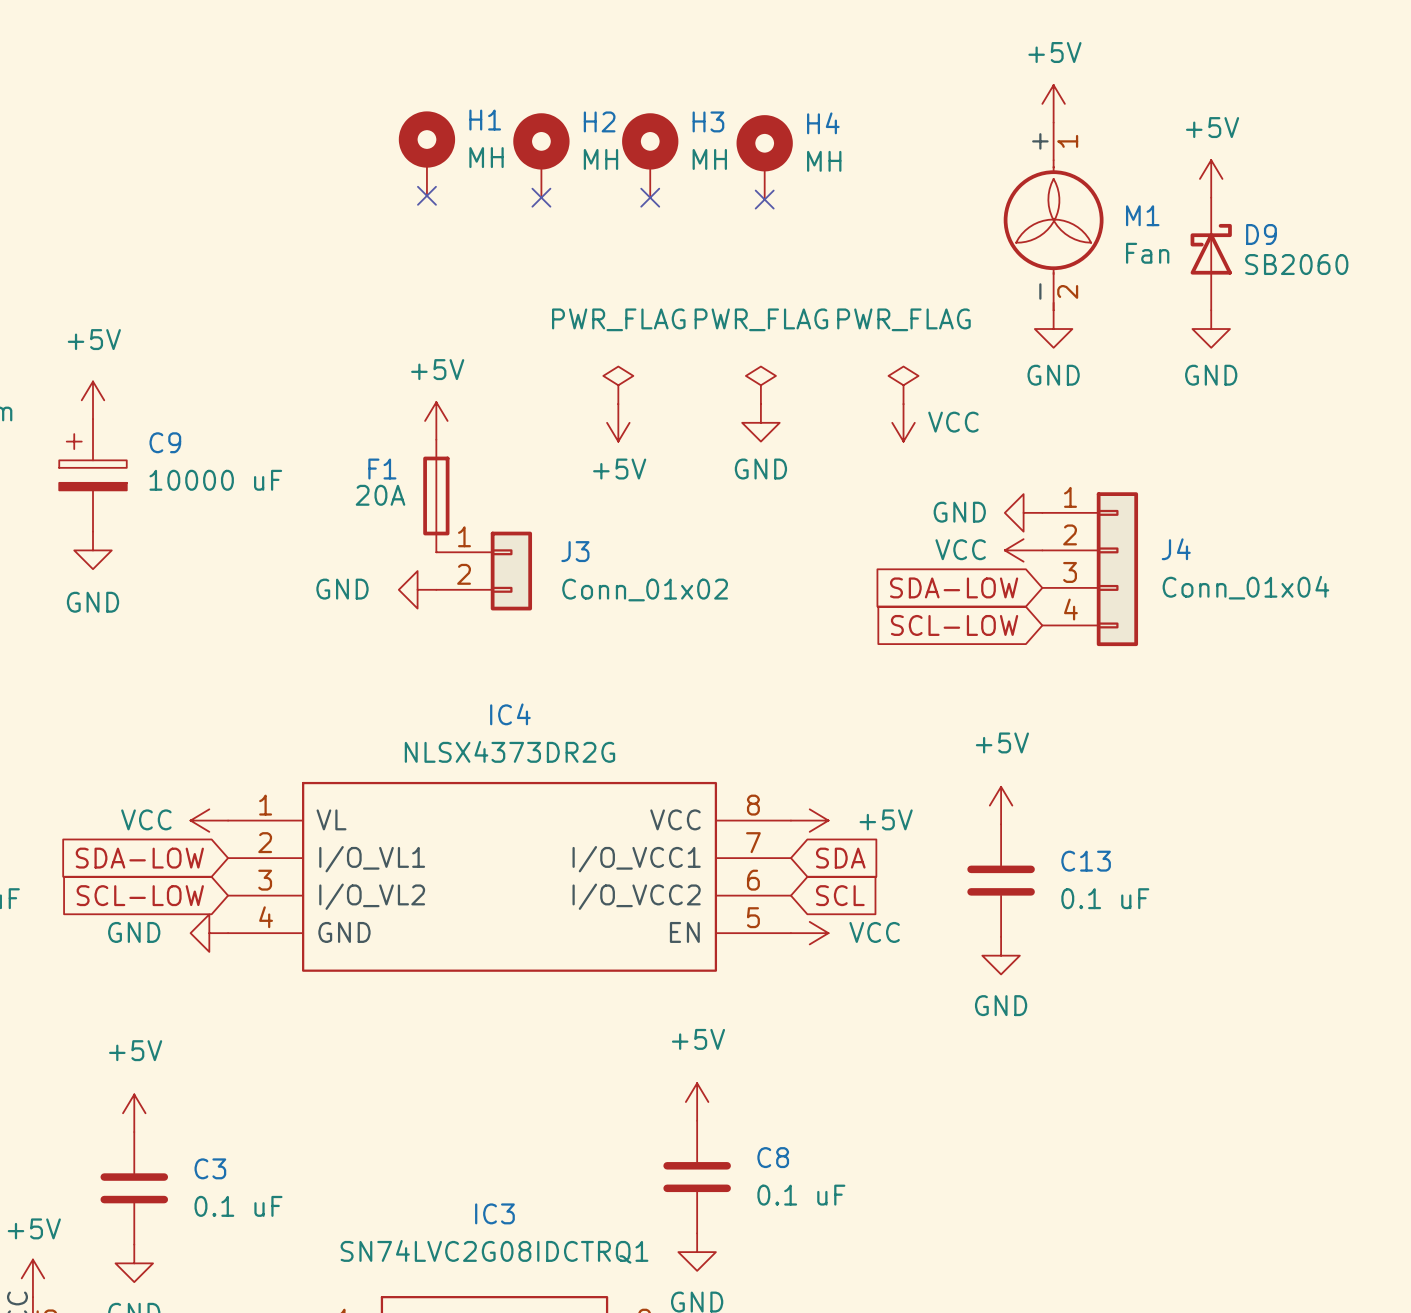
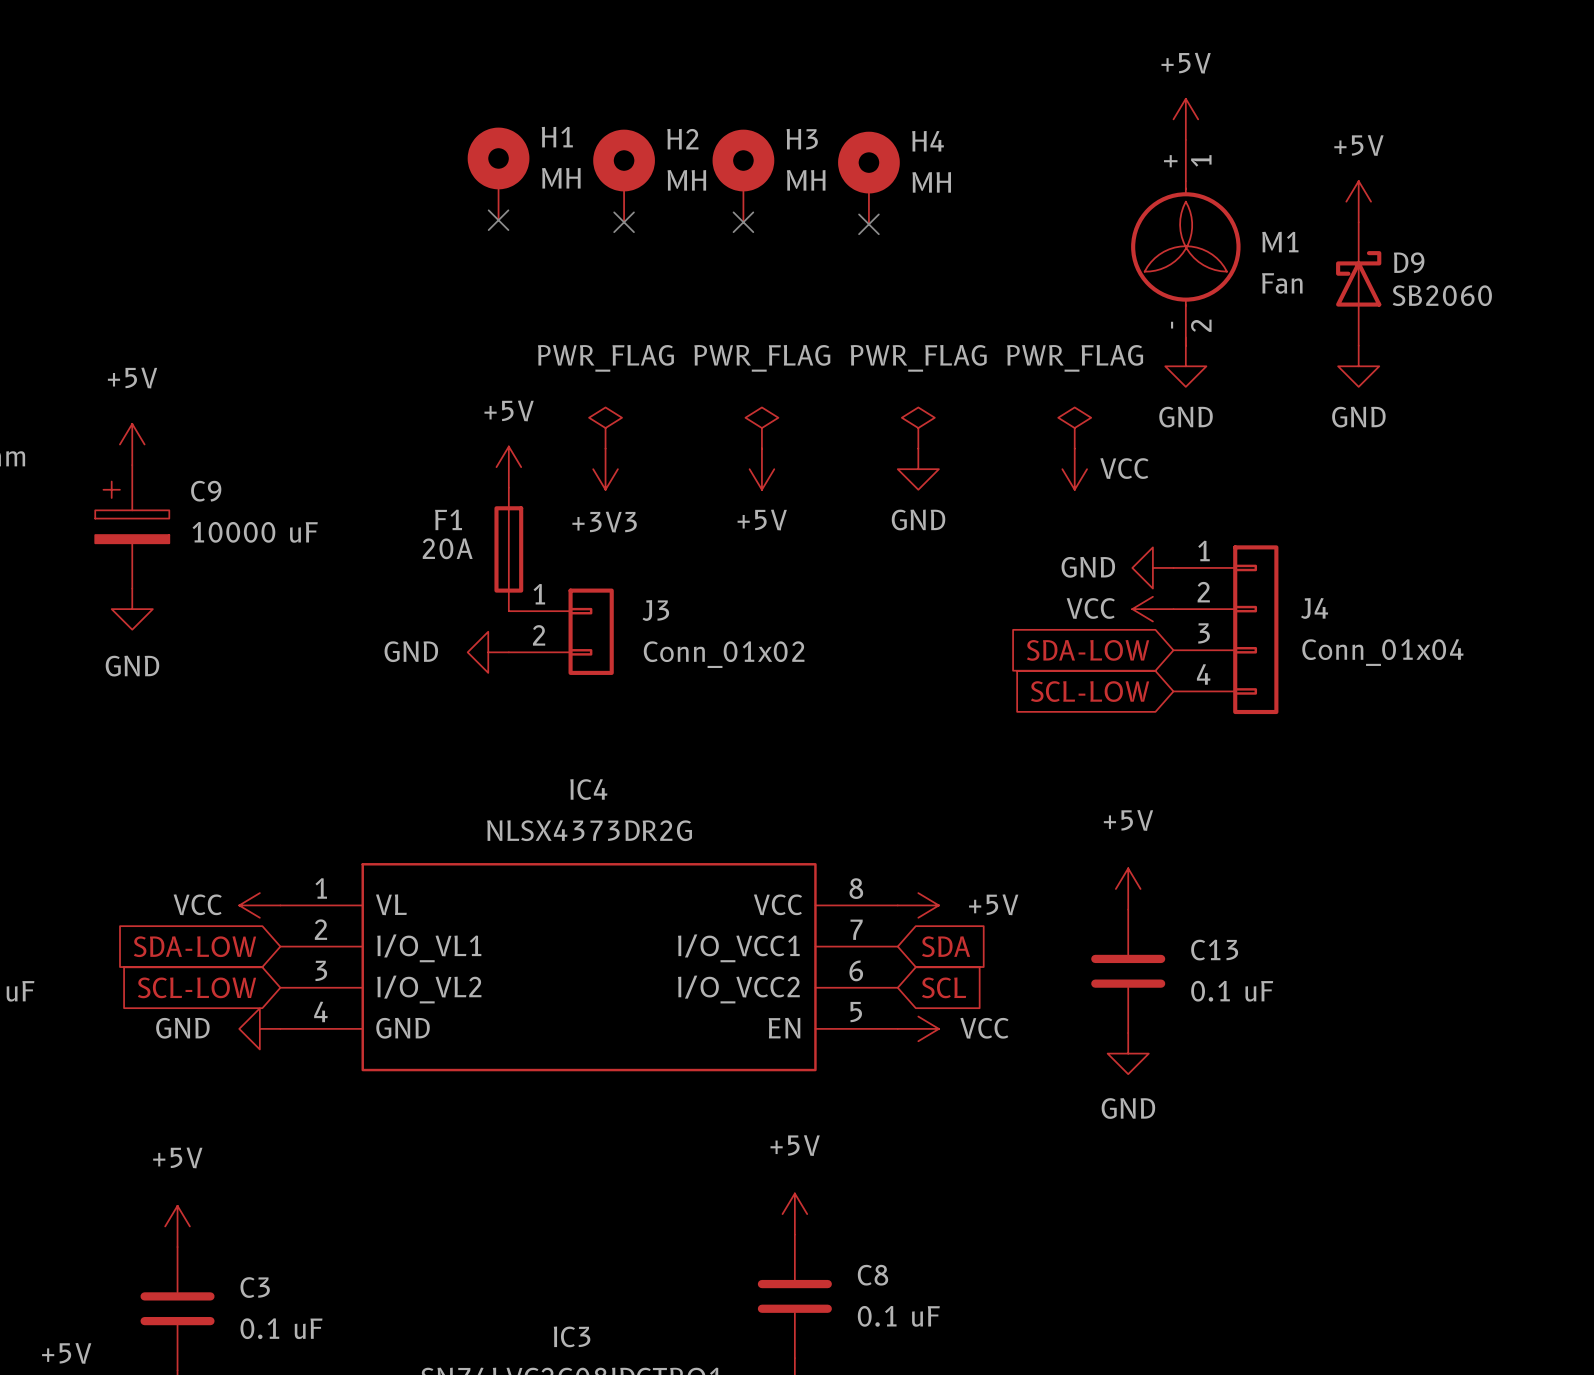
power symbol: none -> PWR_FLAG (605, 428)
power symbol: PWR_FLAG (618, 385) -> none
power symbol: none -> PWR_FLAG (761, 428)
power symbol: PWR_FLAG (760, 385) -> none
power symbol: none -> PWR_FLAG (918, 428)
power symbol: PWR_FLAG (903, 385) -> none
power symbol: none -> PWR_FLAG (1074, 428)
power symbol: none -> +3V3 (605, 469)
power symbol position: +5V (618, 422) -> +5V (761, 469)
power symbol position: GND (760, 422) -> GND (918, 469)
power symbol position: VCC (903, 422) -> VCC (1074, 469)

